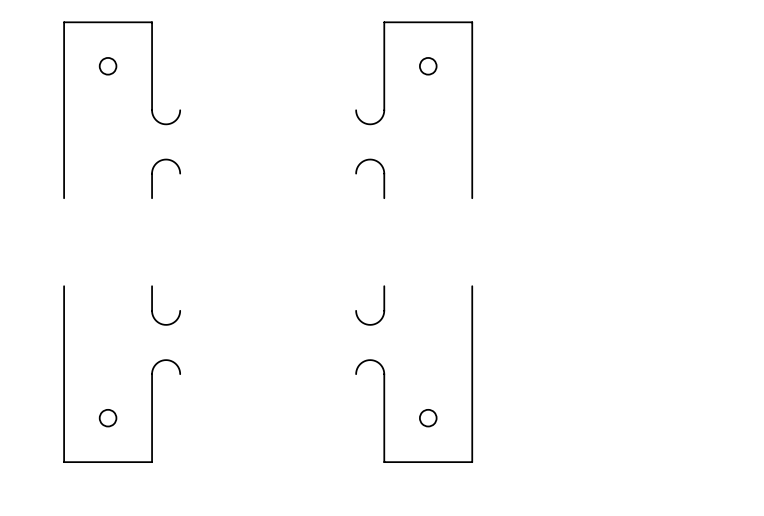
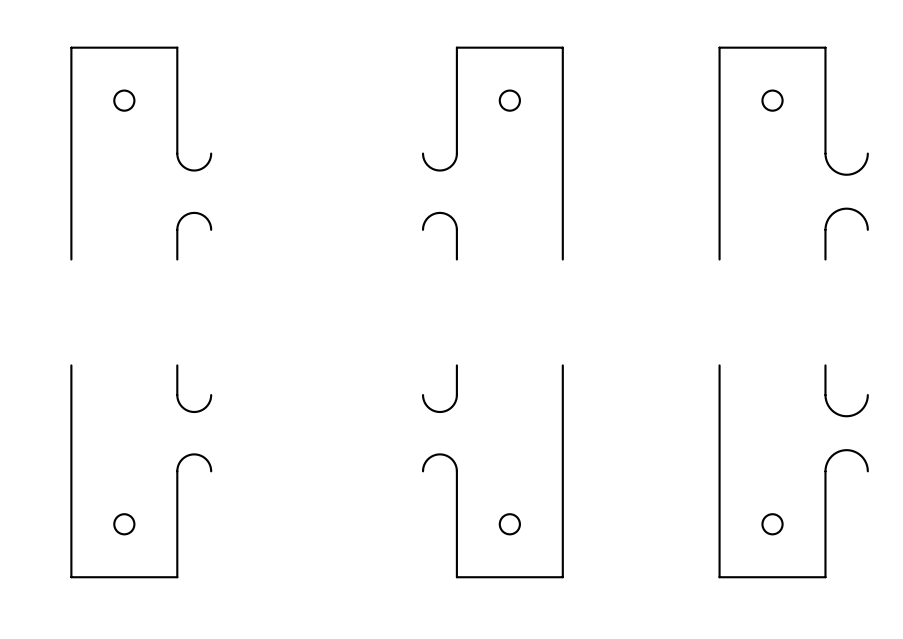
round board edge: none -> [761, 89, 784, 112]
board edge: none -> (867, 153) (863, 166) (852, 174) (843, 174) (836, 171) (827, 161) (825, 47) (719, 47) (719, 259)
board edge: none -> (867, 229) (865, 219) (857, 211) (846, 208) (833, 213) (828, 219) (825, 227) (825, 259)
board edge: none -> (719, 365) (719, 577) (825, 577) (827, 463) (831, 456) (838, 451) (852, 450) (863, 458) (867, 471)
board edge: none -> (825, 365) (825, 397) (828, 405) (833, 411) (843, 416) (854, 414) (863, 407) (867, 395)
round board edge: none -> [761, 513, 784, 536]

